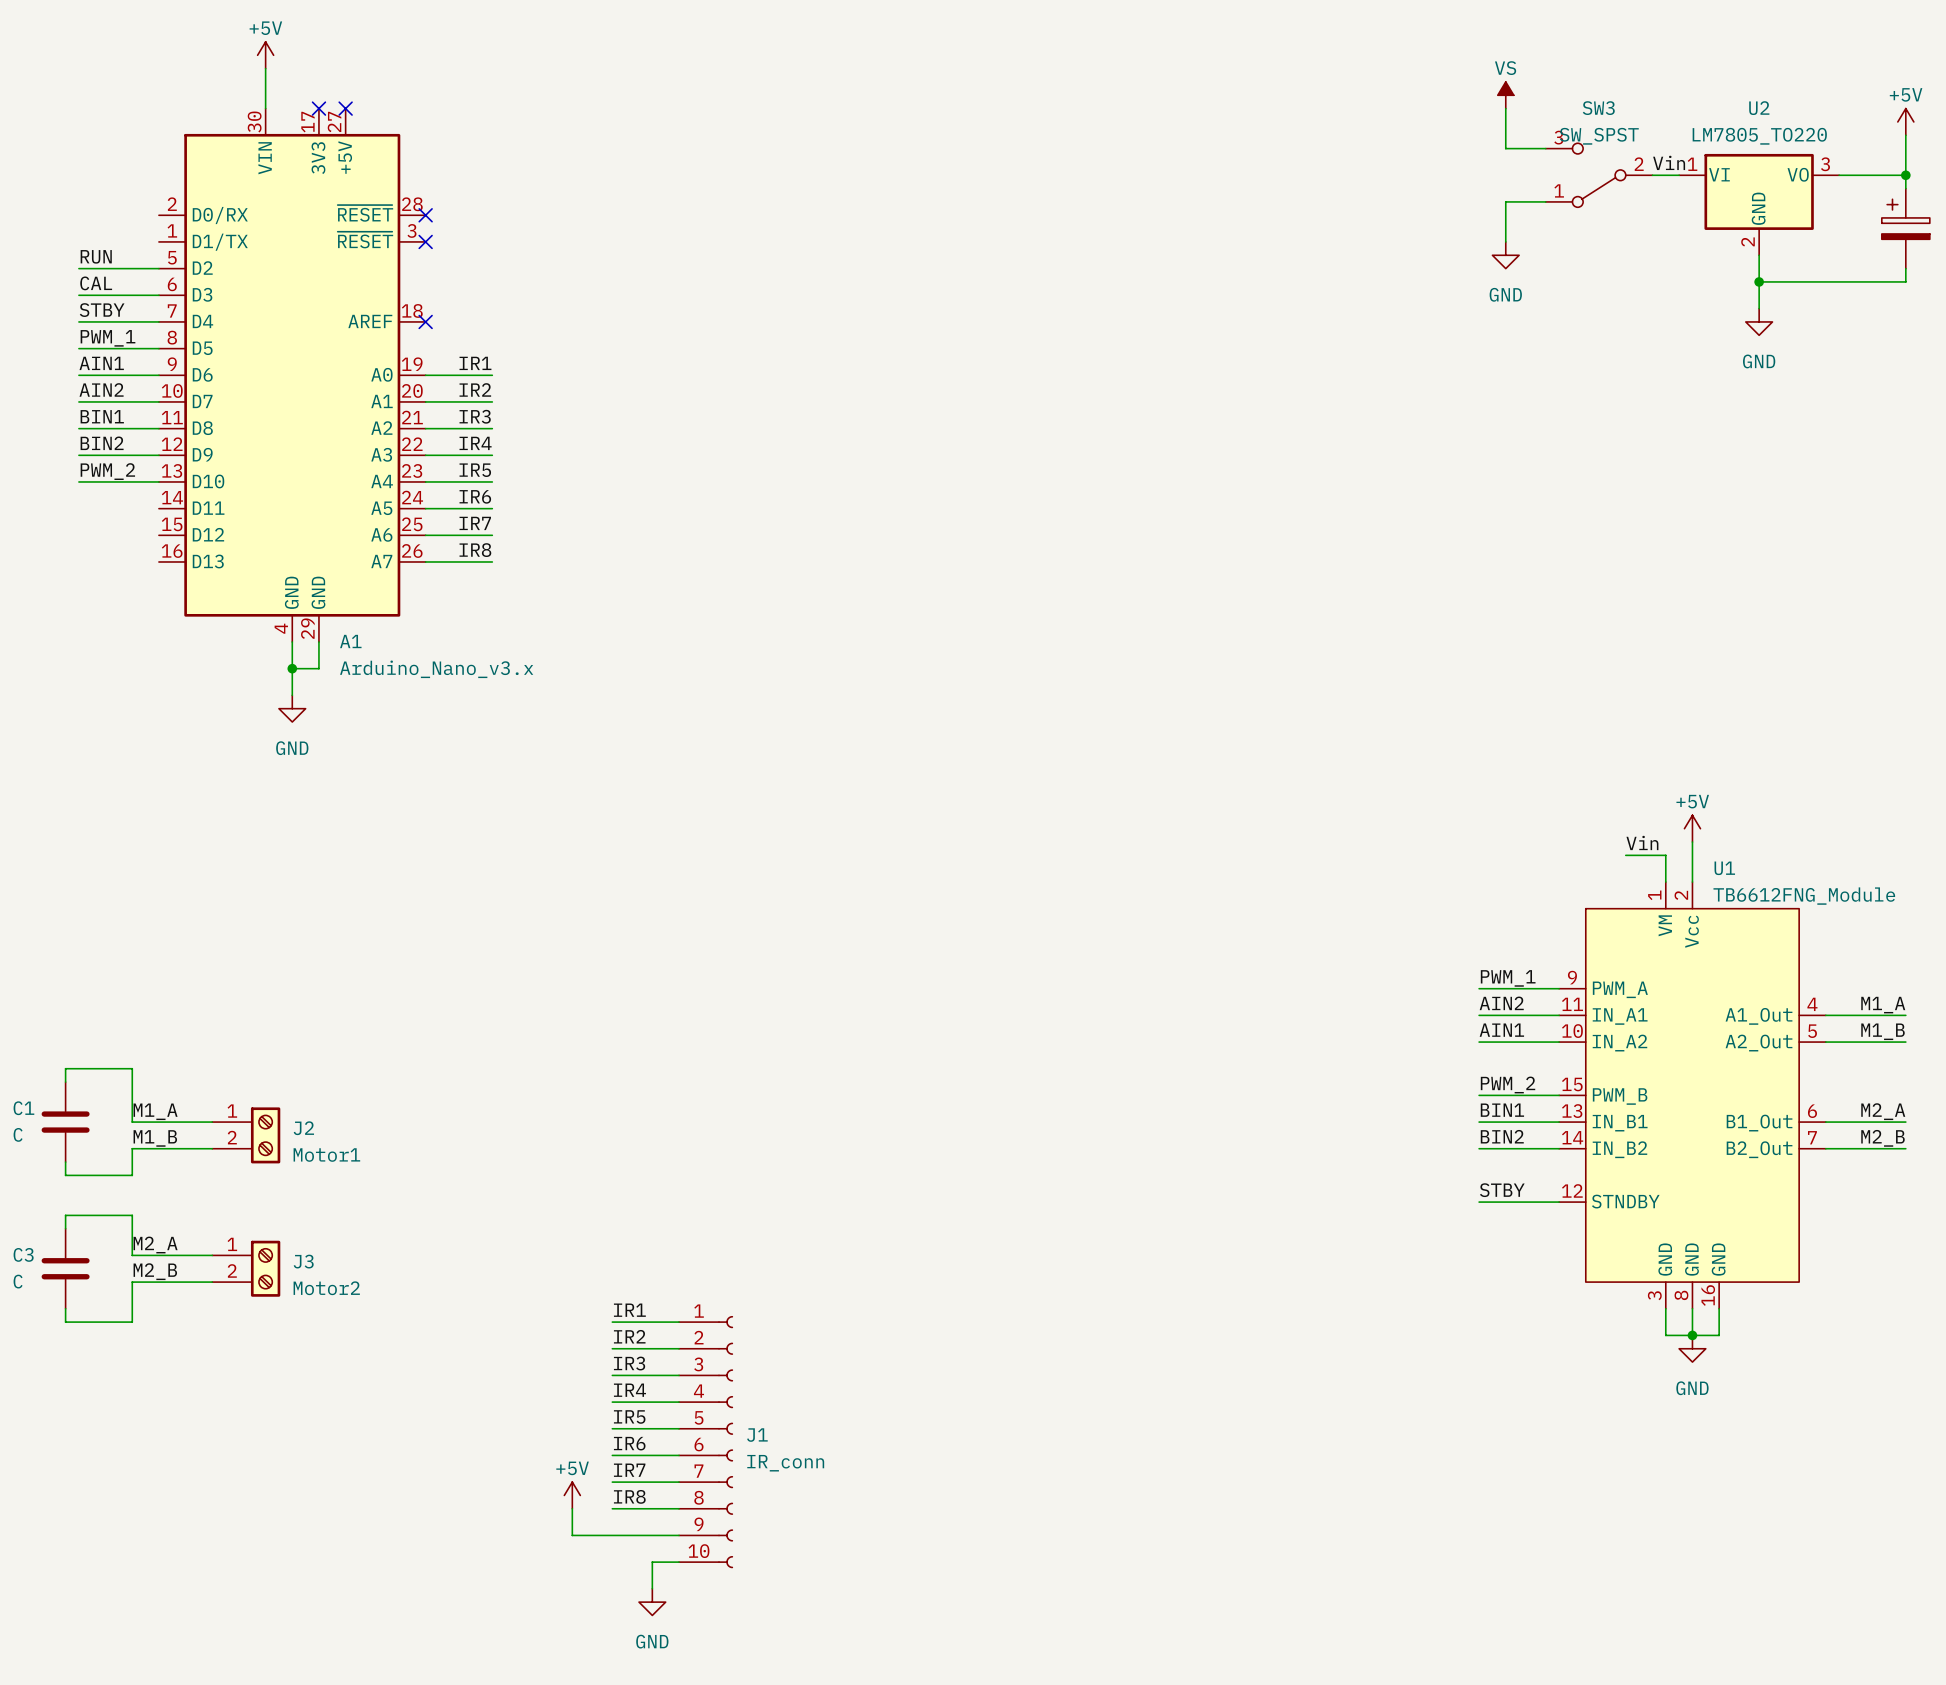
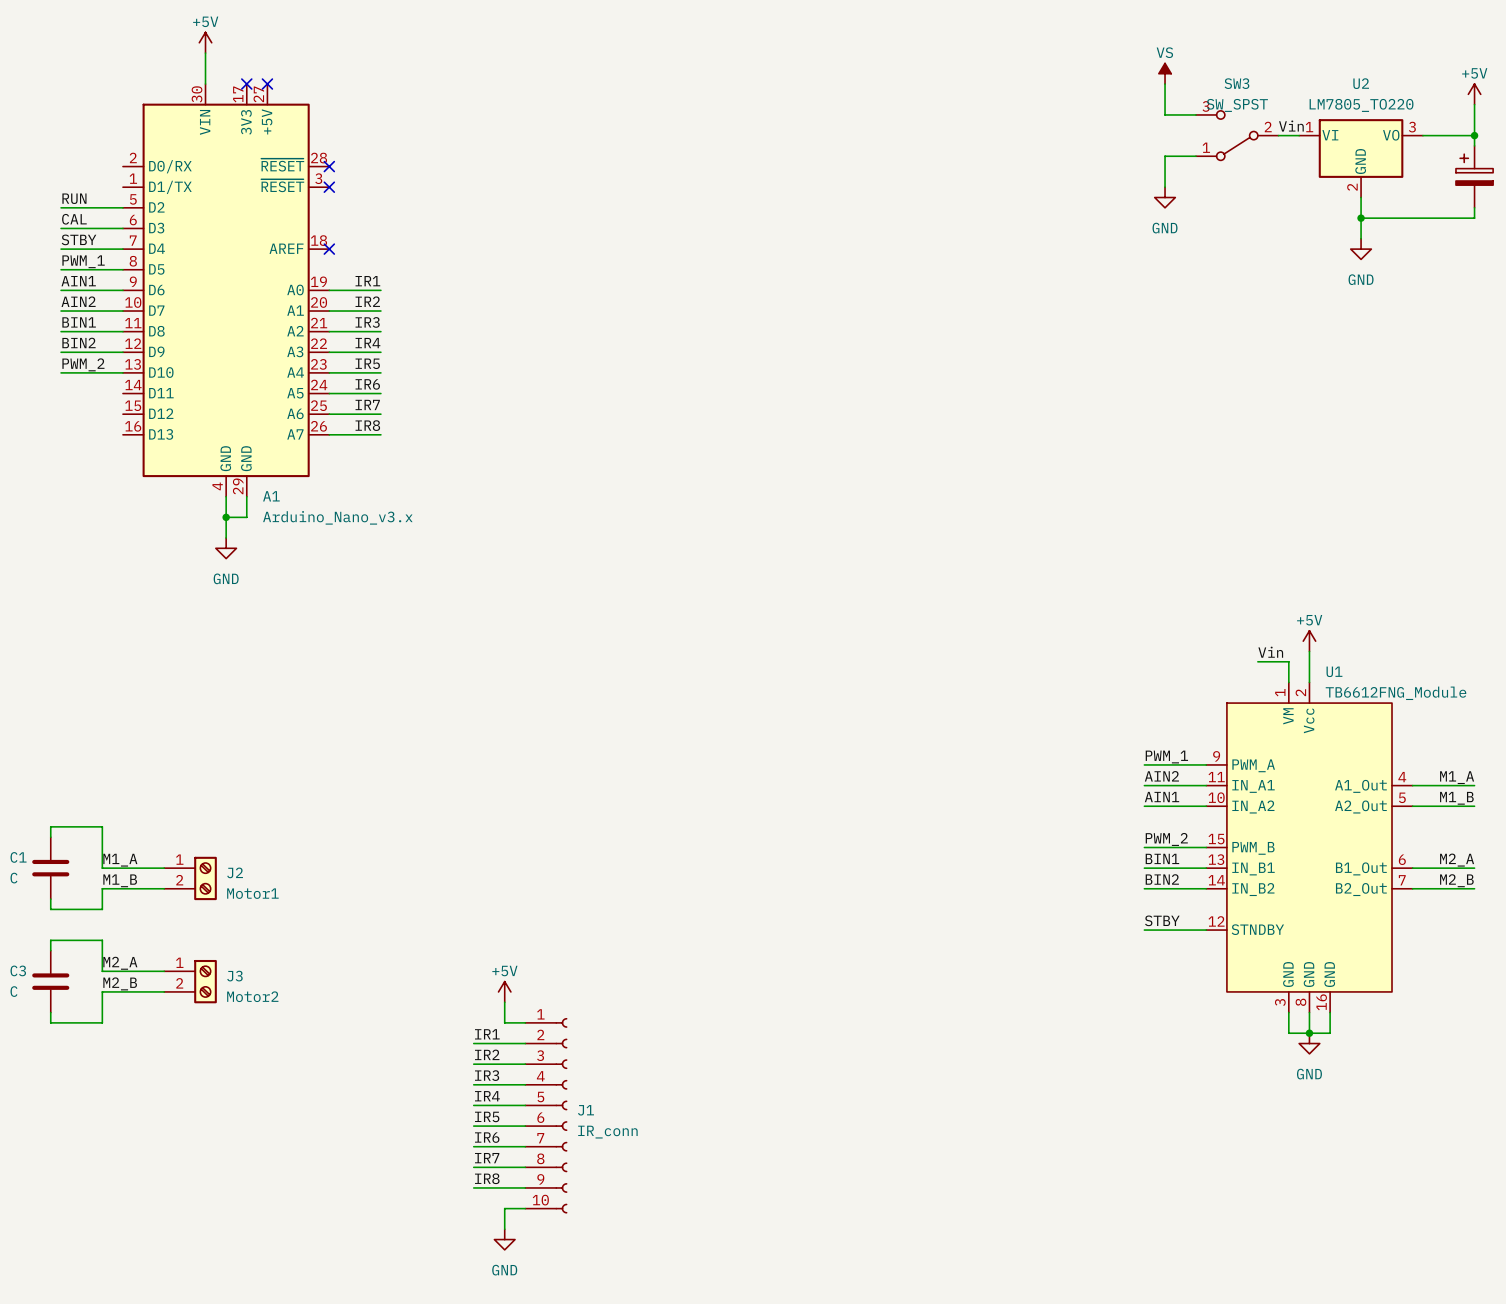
label: IR1 (629, 1310) -> none
wire: (612, 1322) (652, 1322) -> (504, 1002) (504, 1022)
label: IR2 (629, 1336) -> IR1 (487, 1034)
label: IR3 (629, 1363) -> IR2 (487, 1054)
label: IR4 (629, 1390) -> IR3 (487, 1075)
label: IR5 (629, 1416) -> IR4 (487, 1096)
label: IR6 (629, 1443) -> IR5 (487, 1116)
label: IR7 (629, 1470) -> IR6 (487, 1137)
power symbol position: +5V (572, 1495) -> +5V (504, 991)
label: IR8 (629, 1496) -> IR7 (487, 1158)
wire: (572, 1508) (572, 1535) (612, 1535) -> none
label: none -> IR8 (487, 1178)

